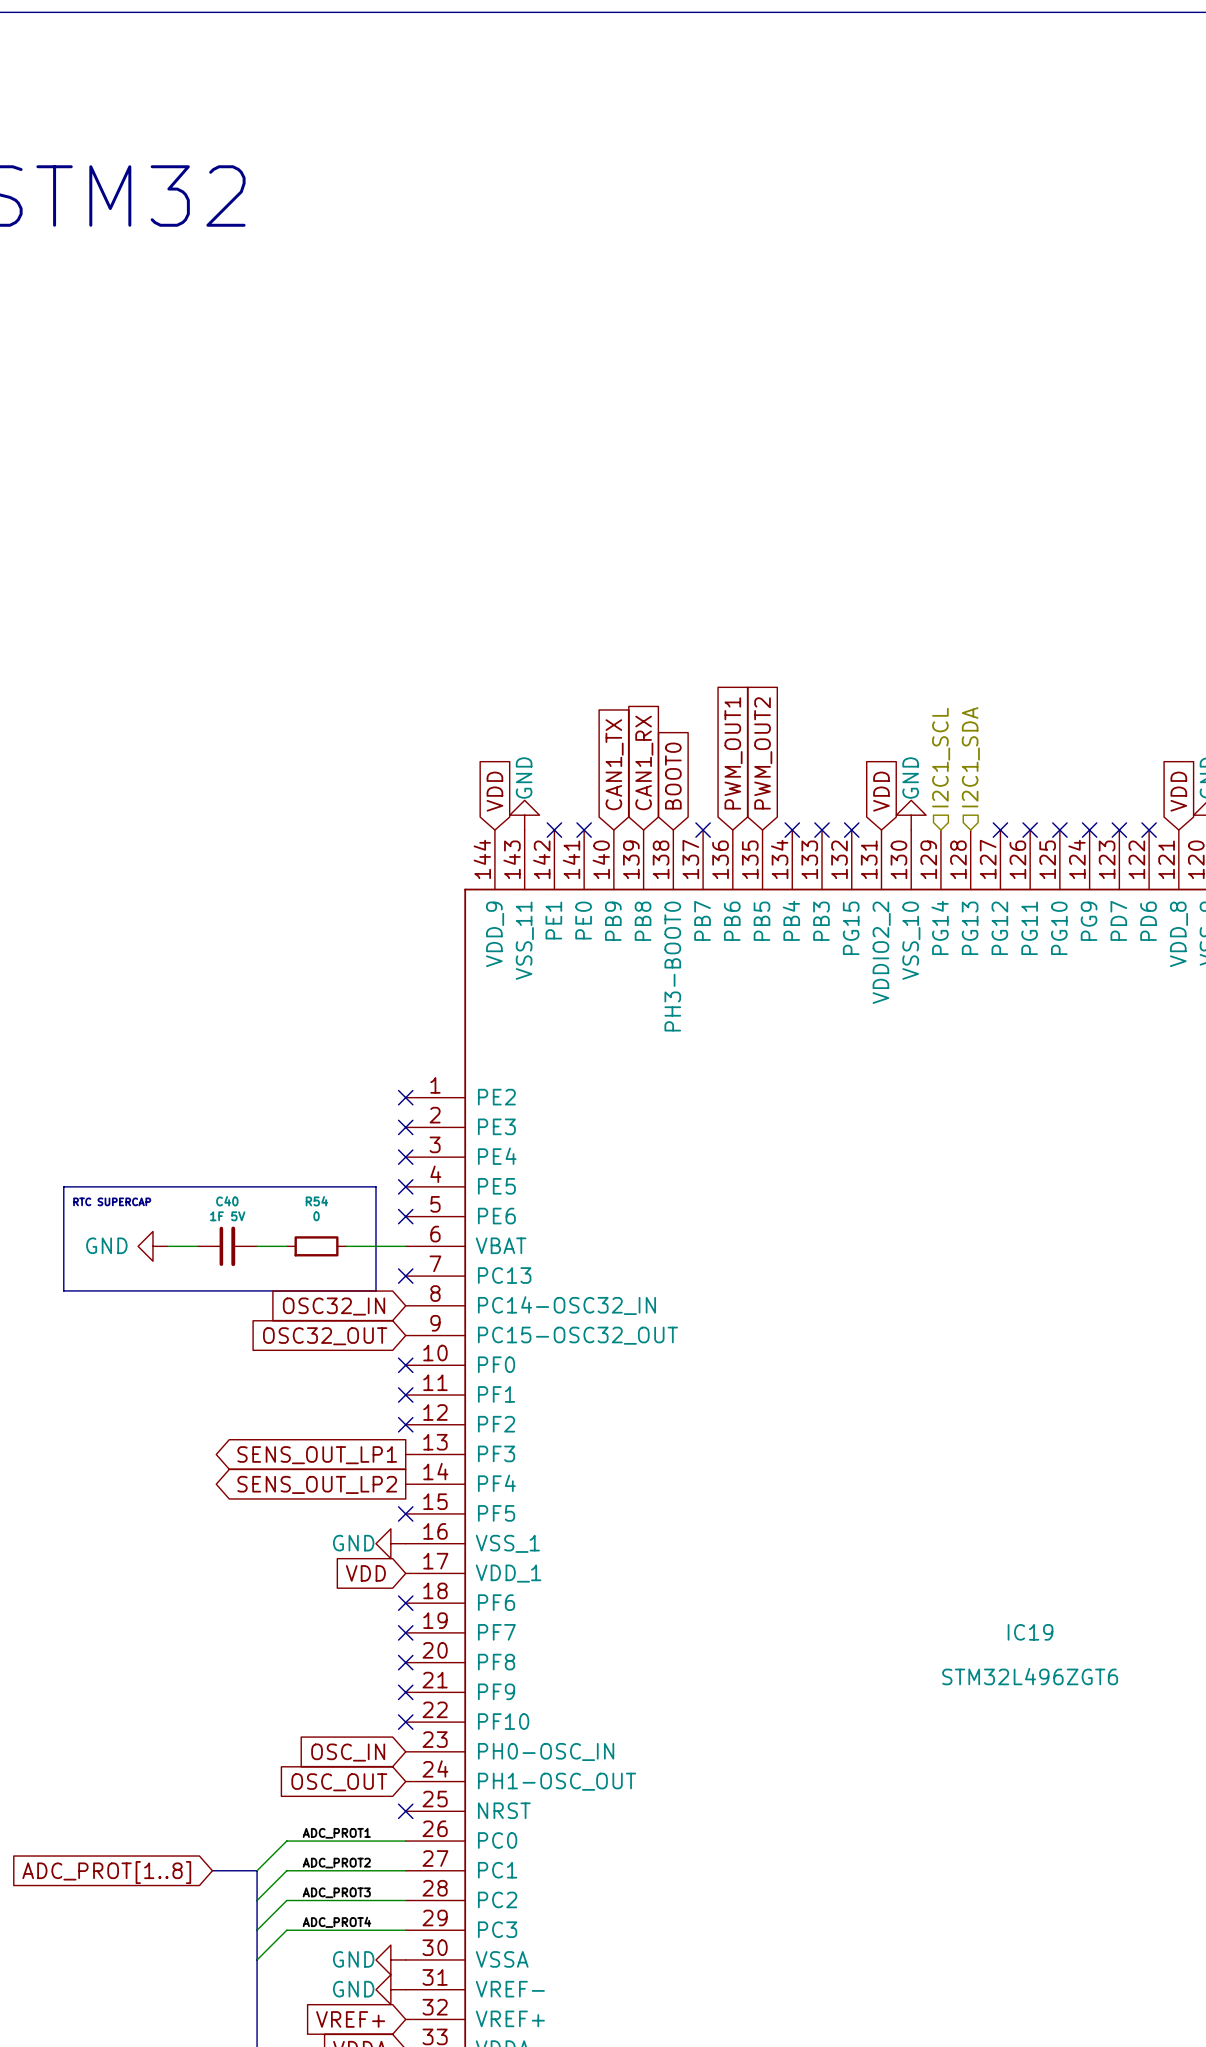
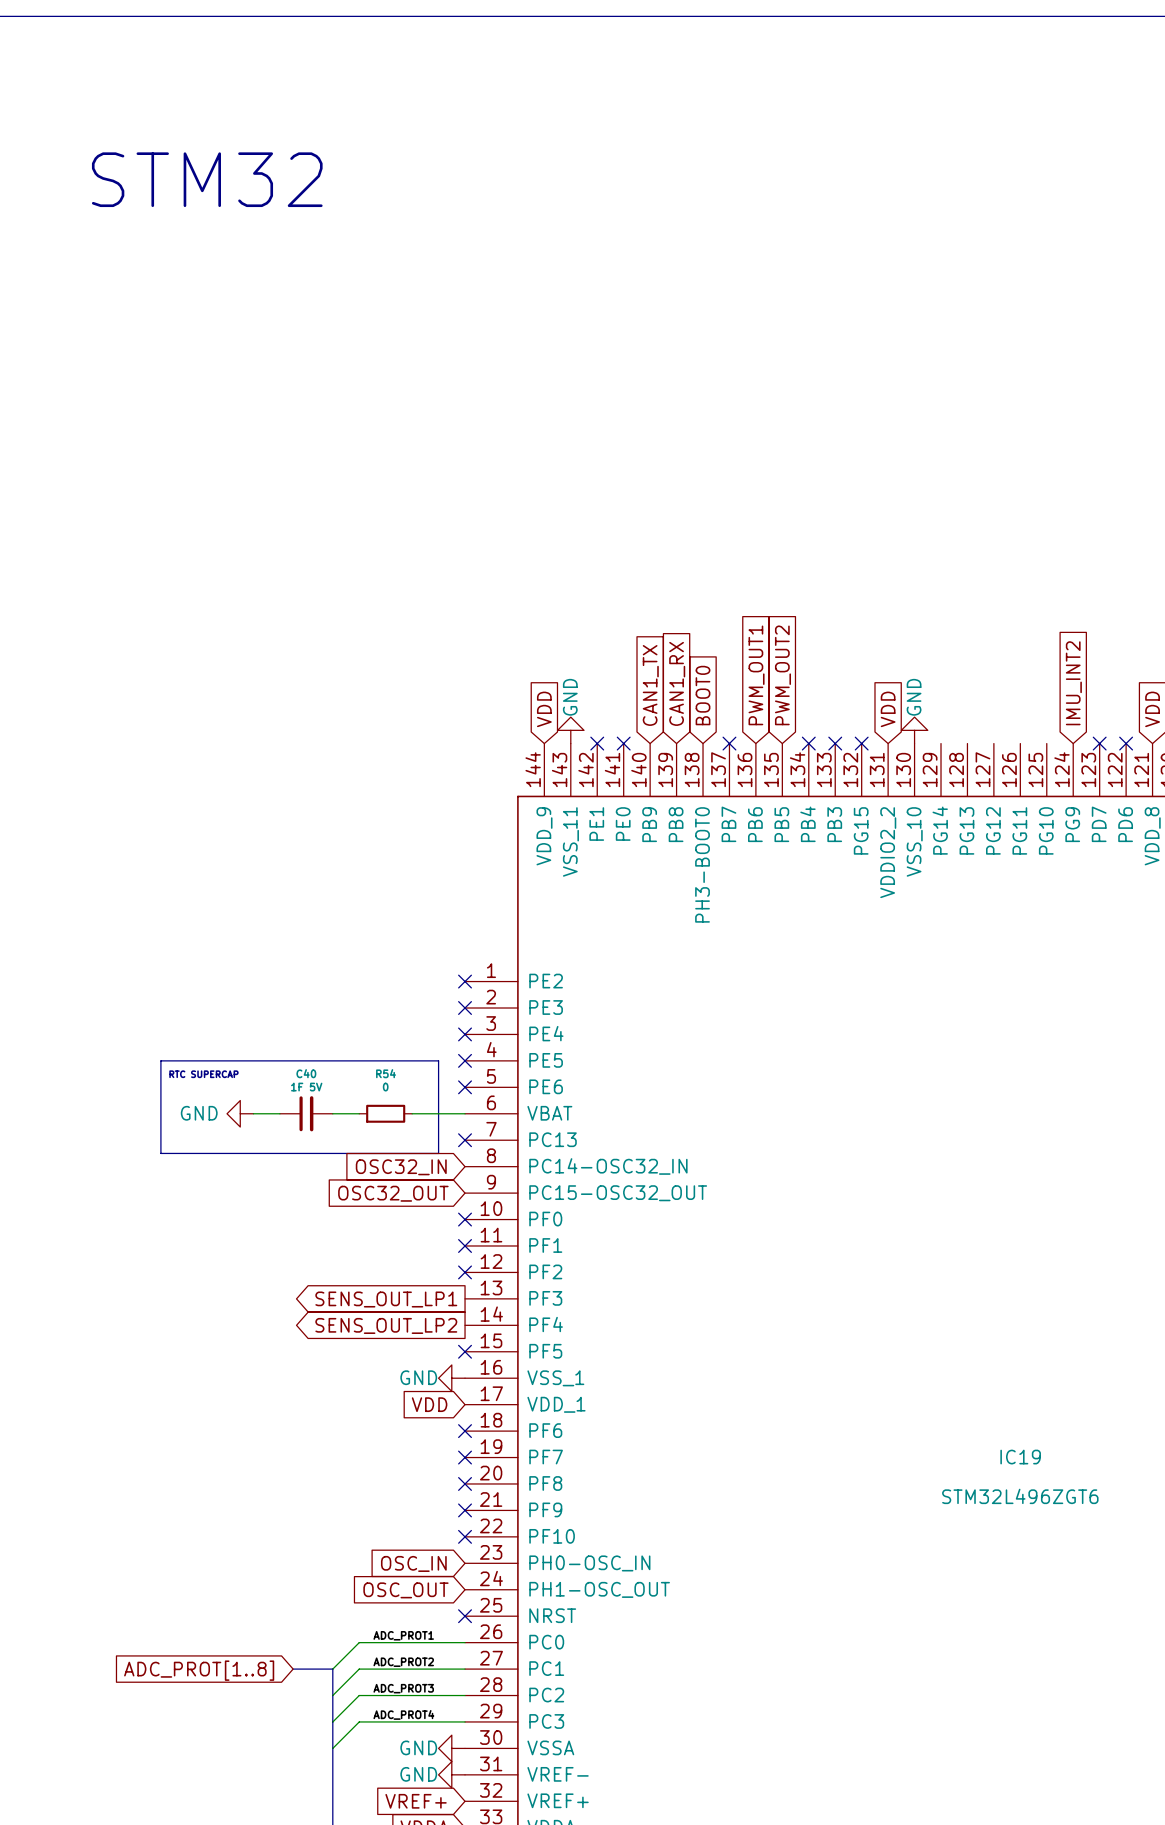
hierarchical label: I2C1_SCL (941, 757) -> none
hierarchical label: I2C1_SDA (970, 757) -> none
global label: none -> IMU_INT2 (1073, 683)
no-connect mark: (1000, 830) -> none
no-connect mark: (1030, 830) -> none
no-connect mark: (1059, 830) -> none
no-connect mark: (1089, 830) -> none

